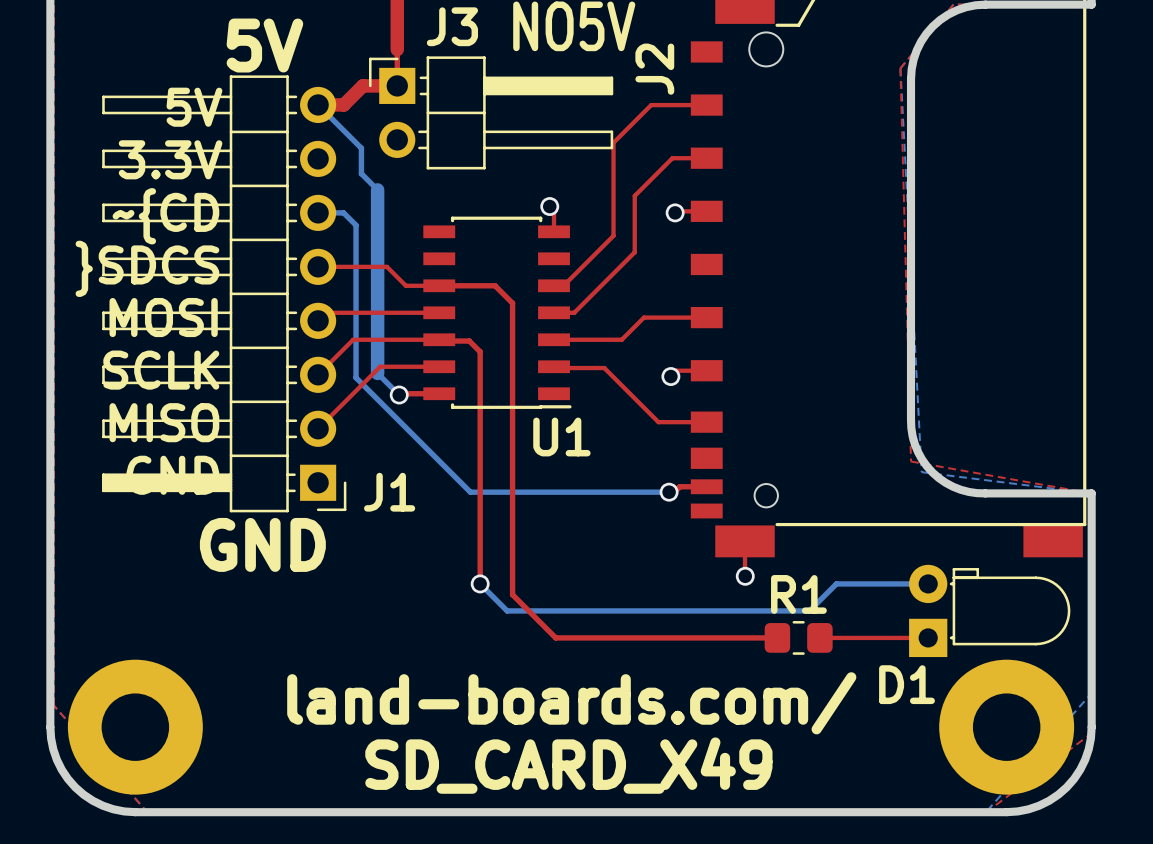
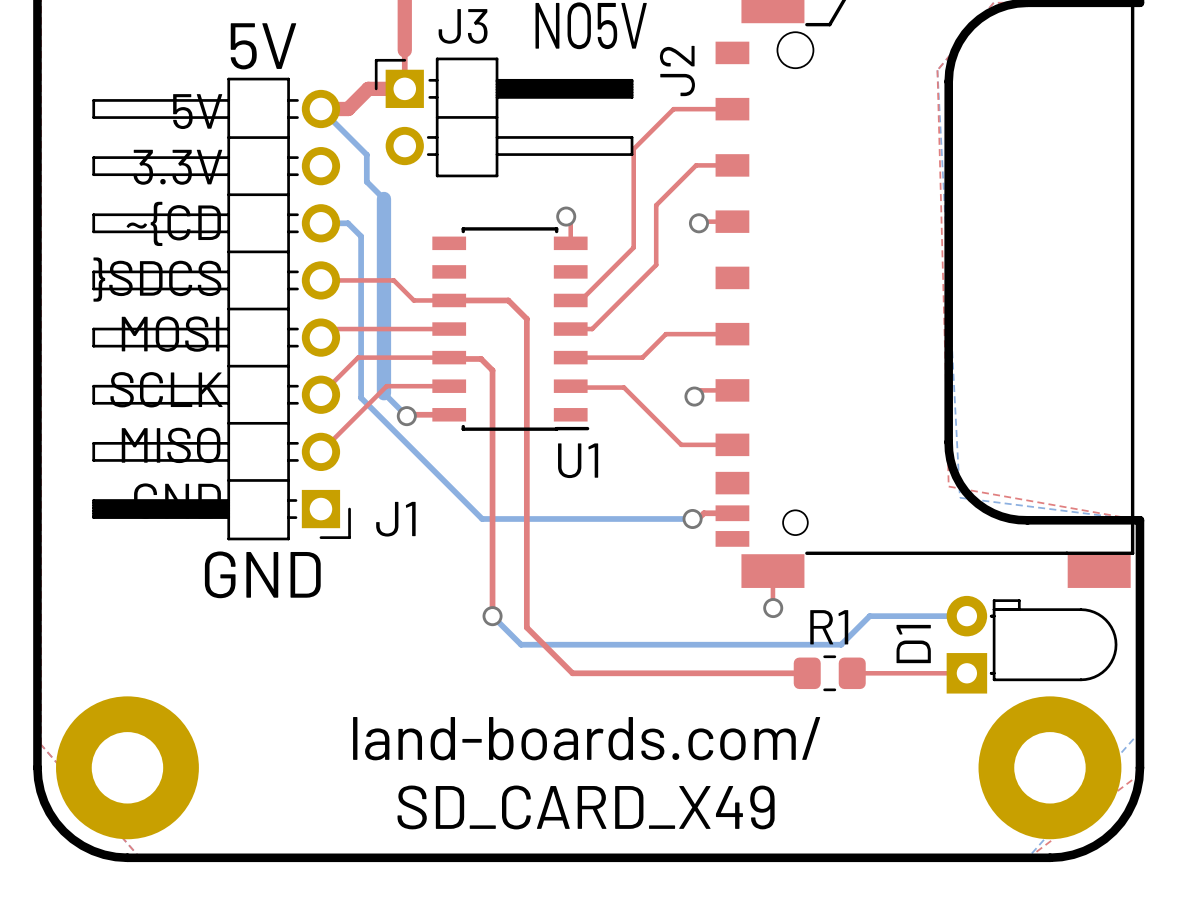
D1 name rotation: 0° (907, 684) -> 90° counterclockwise (913, 644)

